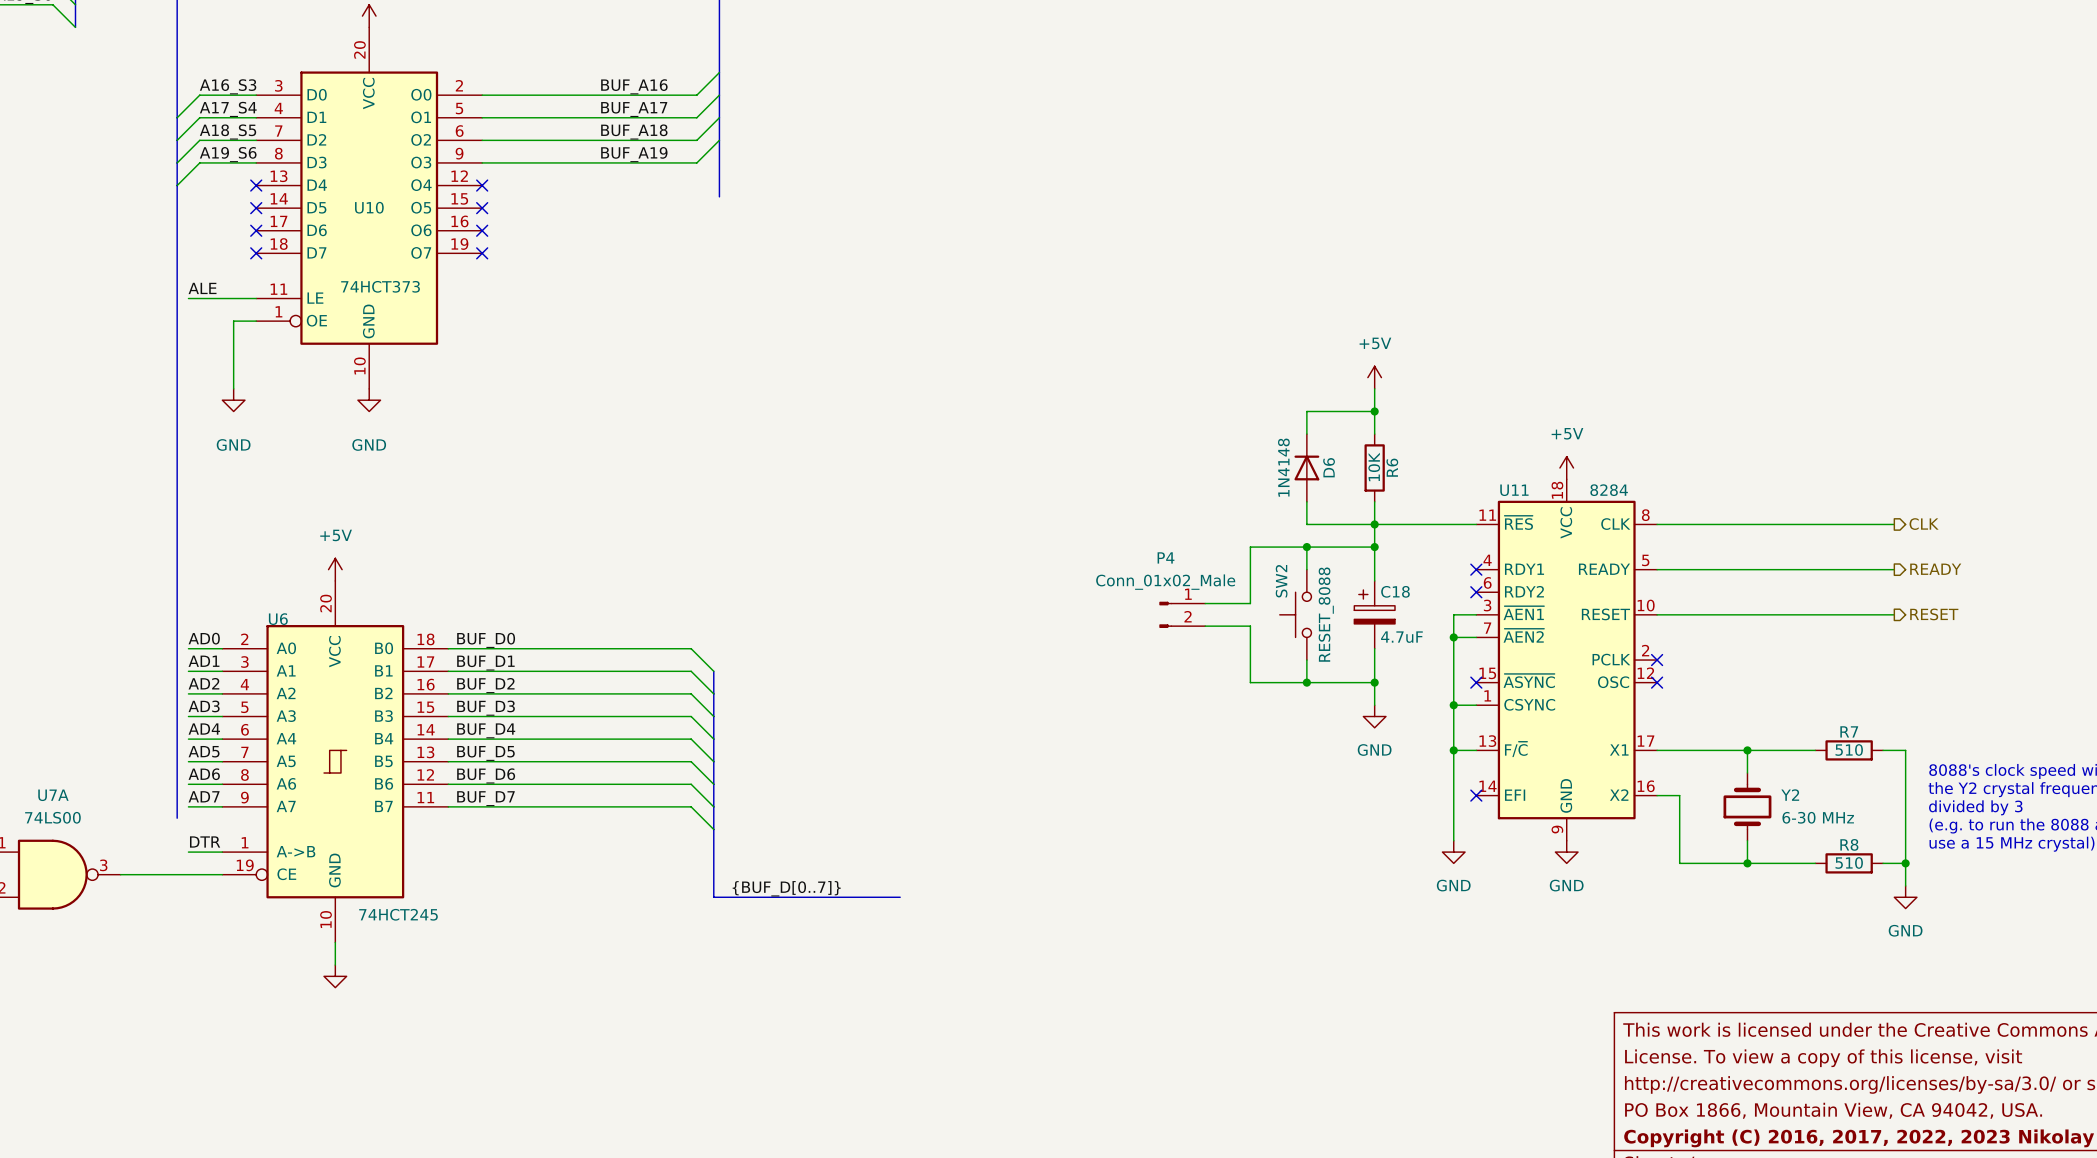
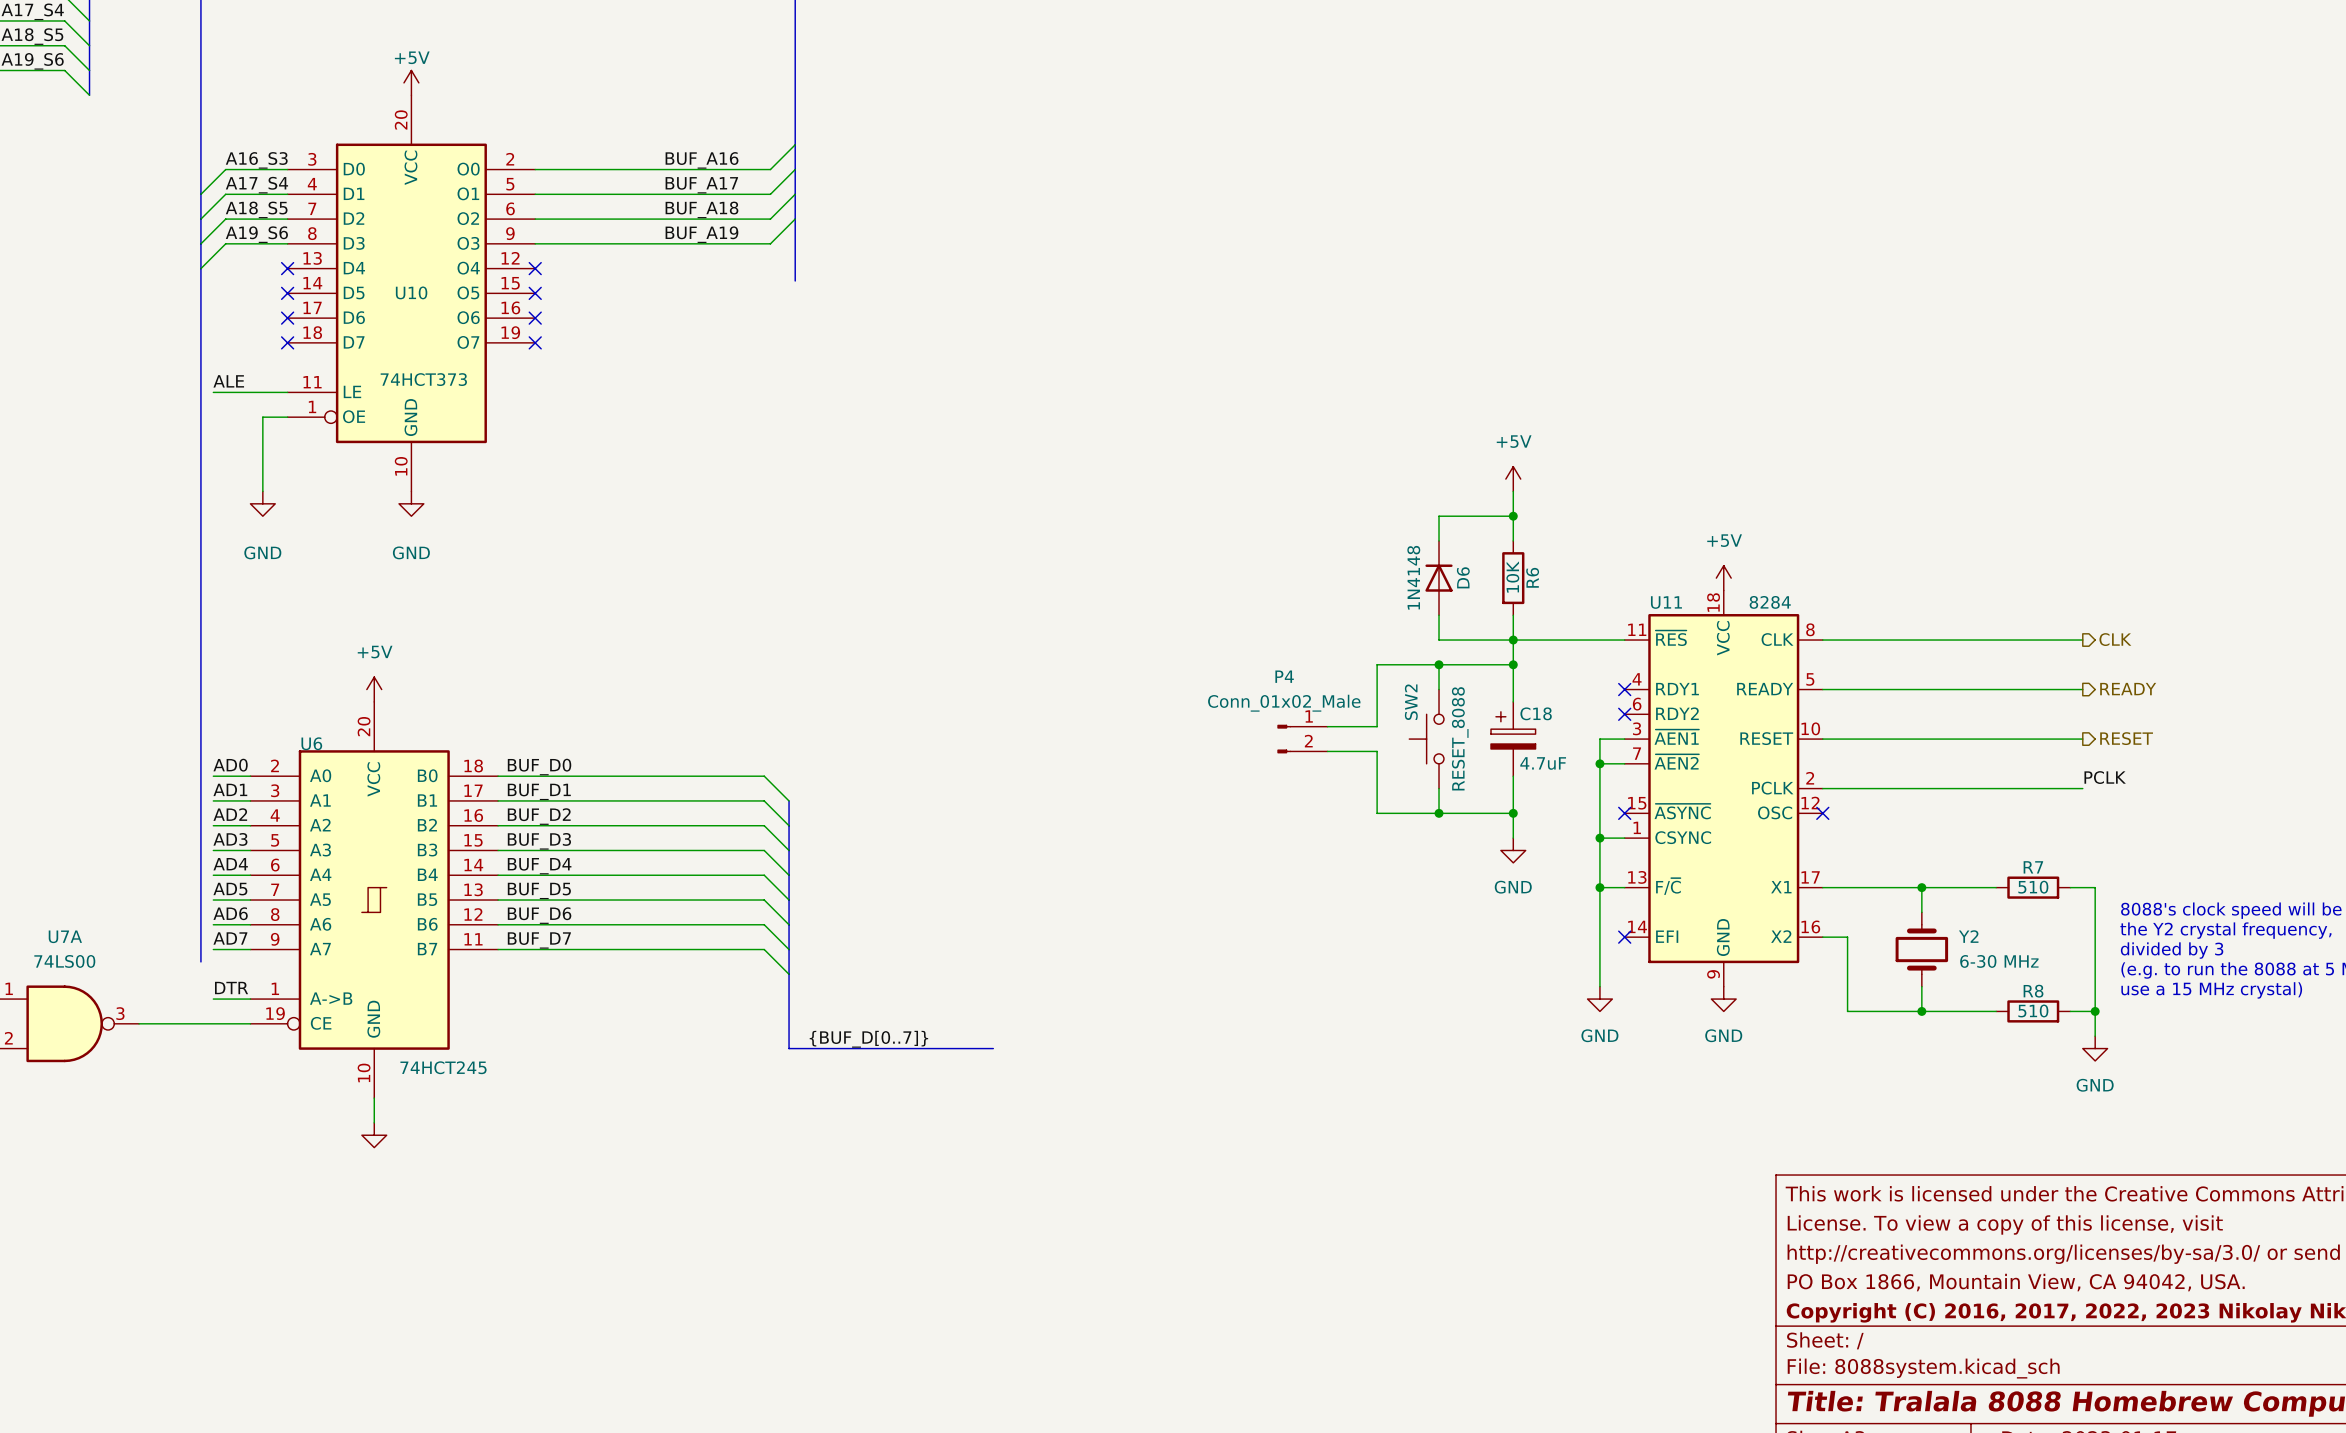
label: none -> PCLK (2105, 777)
wire: none -> (1822, 788) (2082, 788)
no-connect mark: (1657, 660) -> none

